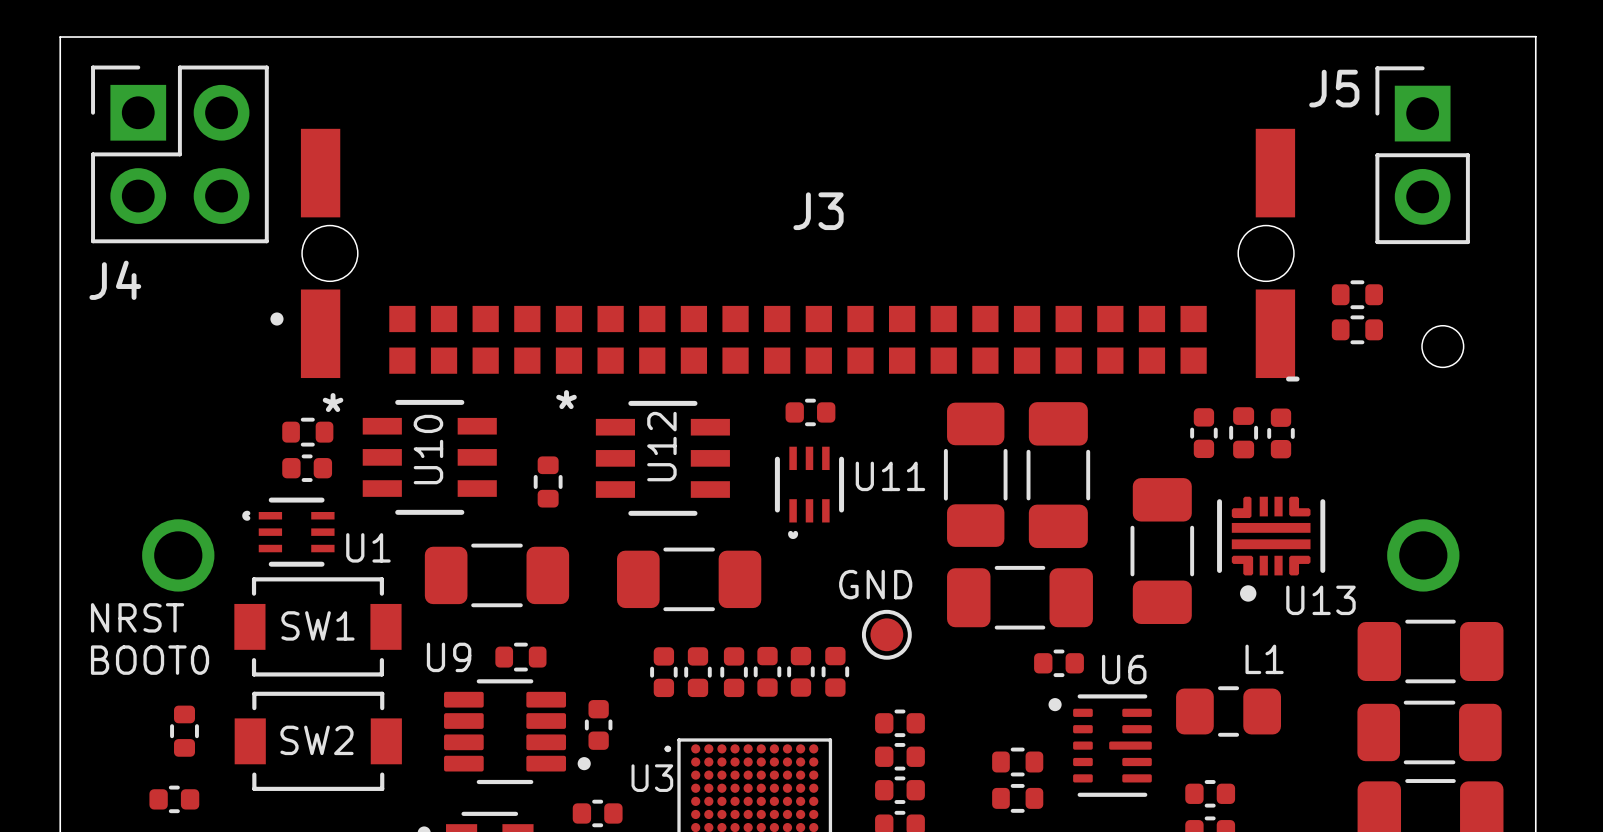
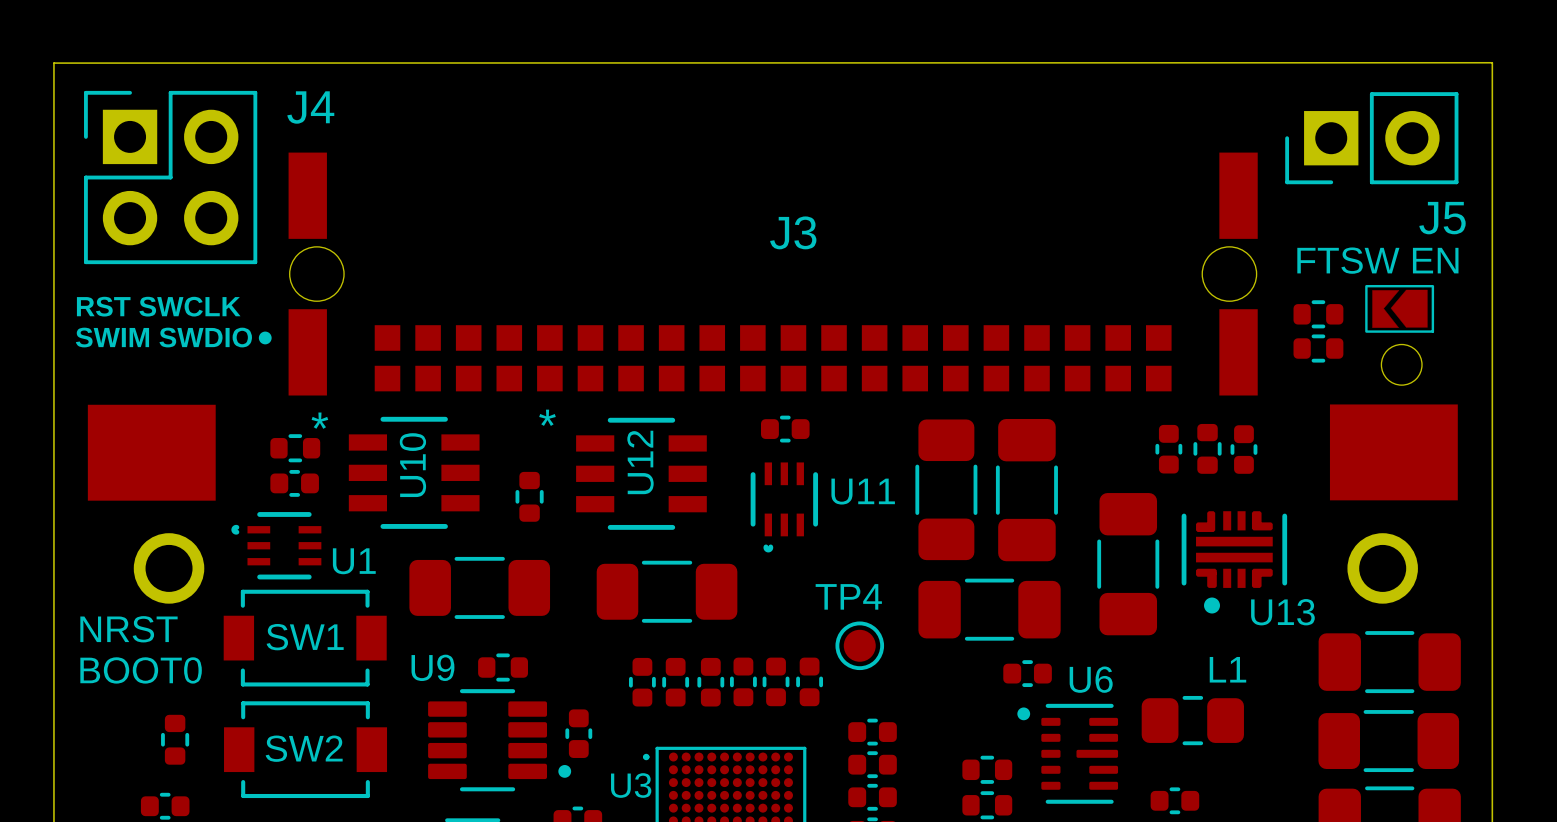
J5 name position: J5 (1334, 88) -> J5 (1442, 218)
J5 rotation: 0° (1422, 155) -> 90° counterclockwise (1371, 138)
J4 name position: J4 (115, 280) -> J4 (310, 107)
text: none -> RST SWCLK (158, 306)
part: none -> FTSW EN (1399, 308)
text: none -> SWIM SWDIO (163, 337)
line: (1288, 379) (1297, 379) -> none
part: none -> (151, 452)
part: none -> (1393, 452)
GND name: GND (875, 584) -> TP4 (848, 596)

